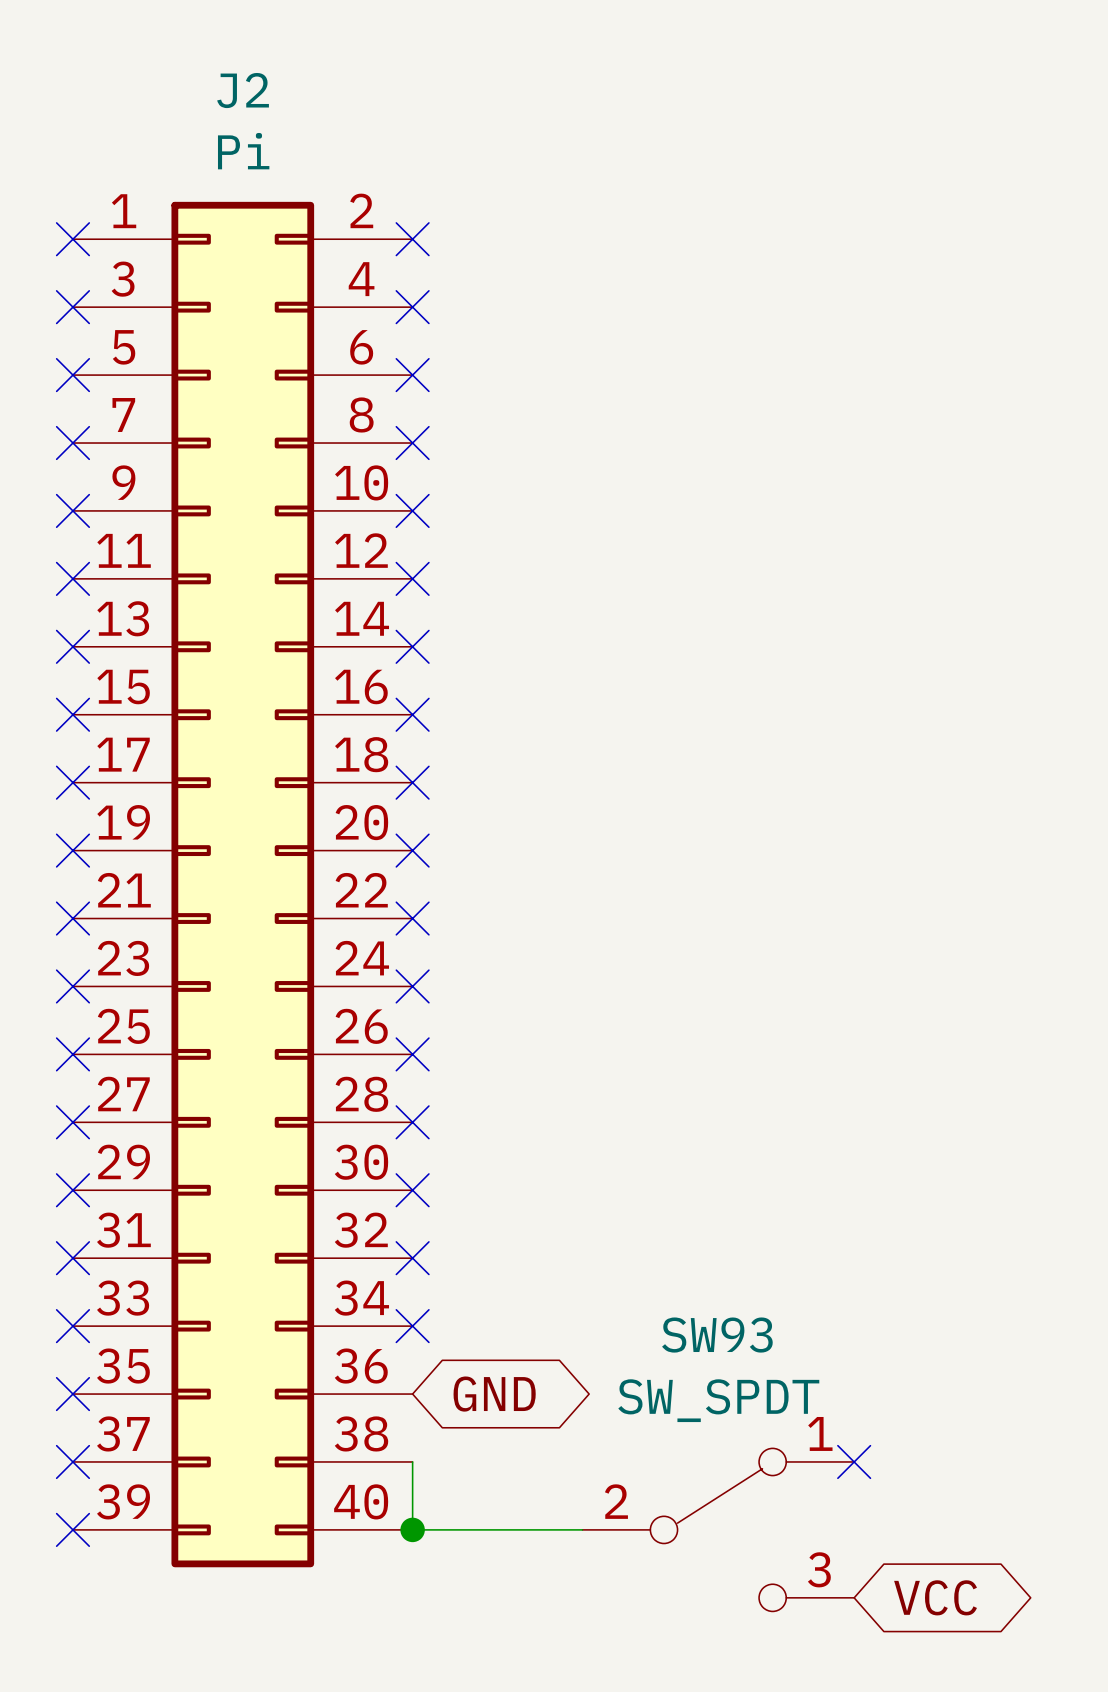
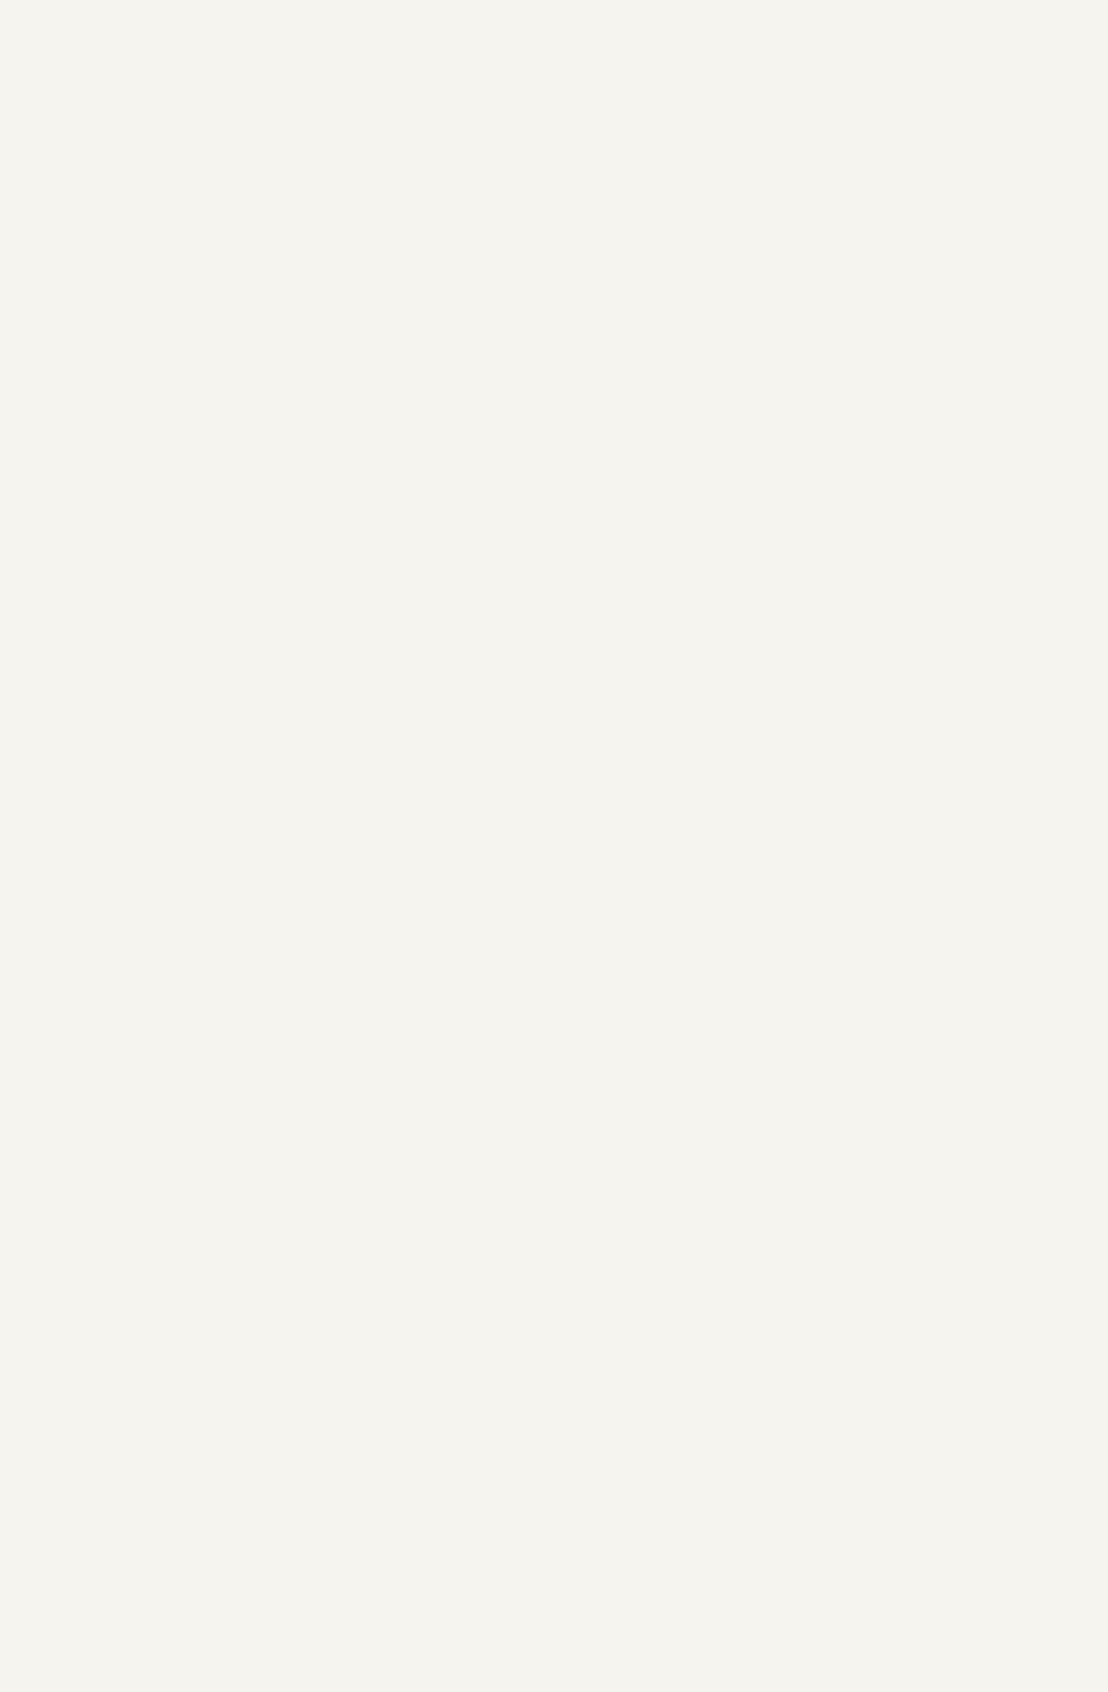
no-connect mark: (72, 239) -> none
no-connect mark: (412, 239) -> none
no-connect mark: (72, 307) -> none
no-connect mark: (412, 307) -> none
no-connect mark: (72, 375) -> none
no-connect mark: (412, 375) -> none
no-connect mark: (72, 443) -> none
no-connect mark: (412, 443) -> none
no-connect mark: (72, 510) -> none
no-connect mark: (412, 510) -> none
no-connect mark: (72, 578) -> none
no-connect mark: (412, 578) -> none
no-connect mark: (72, 646) -> none
no-connect mark: (412, 646) -> none
no-connect mark: (72, 714) -> none
no-connect mark: (412, 714) -> none
no-connect mark: (72, 782) -> none
no-connect mark: (412, 782) -> none
no-connect mark: (72, 850) -> none
no-connect mark: (412, 850) -> none
J2: Pi (242, 884) -> none
no-connect mark: (72, 918) -> none
no-connect mark: (412, 918) -> none
no-connect mark: (72, 986) -> none
no-connect mark: (412, 986) -> none
no-connect mark: (72, 1054) -> none
no-connect mark: (412, 1054) -> none
no-connect mark: (72, 1122) -> none
no-connect mark: (412, 1122) -> none
no-connect mark: (72, 1190) -> none
no-connect mark: (412, 1190) -> none
no-connect mark: (72, 1258) -> none
no-connect mark: (412, 1258) -> none
no-connect mark: (72, 1326) -> none
no-connect mark: (412, 1326) -> none
no-connect mark: (72, 1394) -> none
global label: GND (494, 1394) -> none
no-connect mark: (72, 1461) -> none
wire: (412, 1461) (412, 1529) (582, 1529) -> none
no-connect mark: (854, 1461) -> none
no-connect mark: (72, 1529) -> none
junction: (412, 1529) -> none
SW93: SW_SPDT (718, 1529) -> none
global label: VCC (935, 1597) -> none

